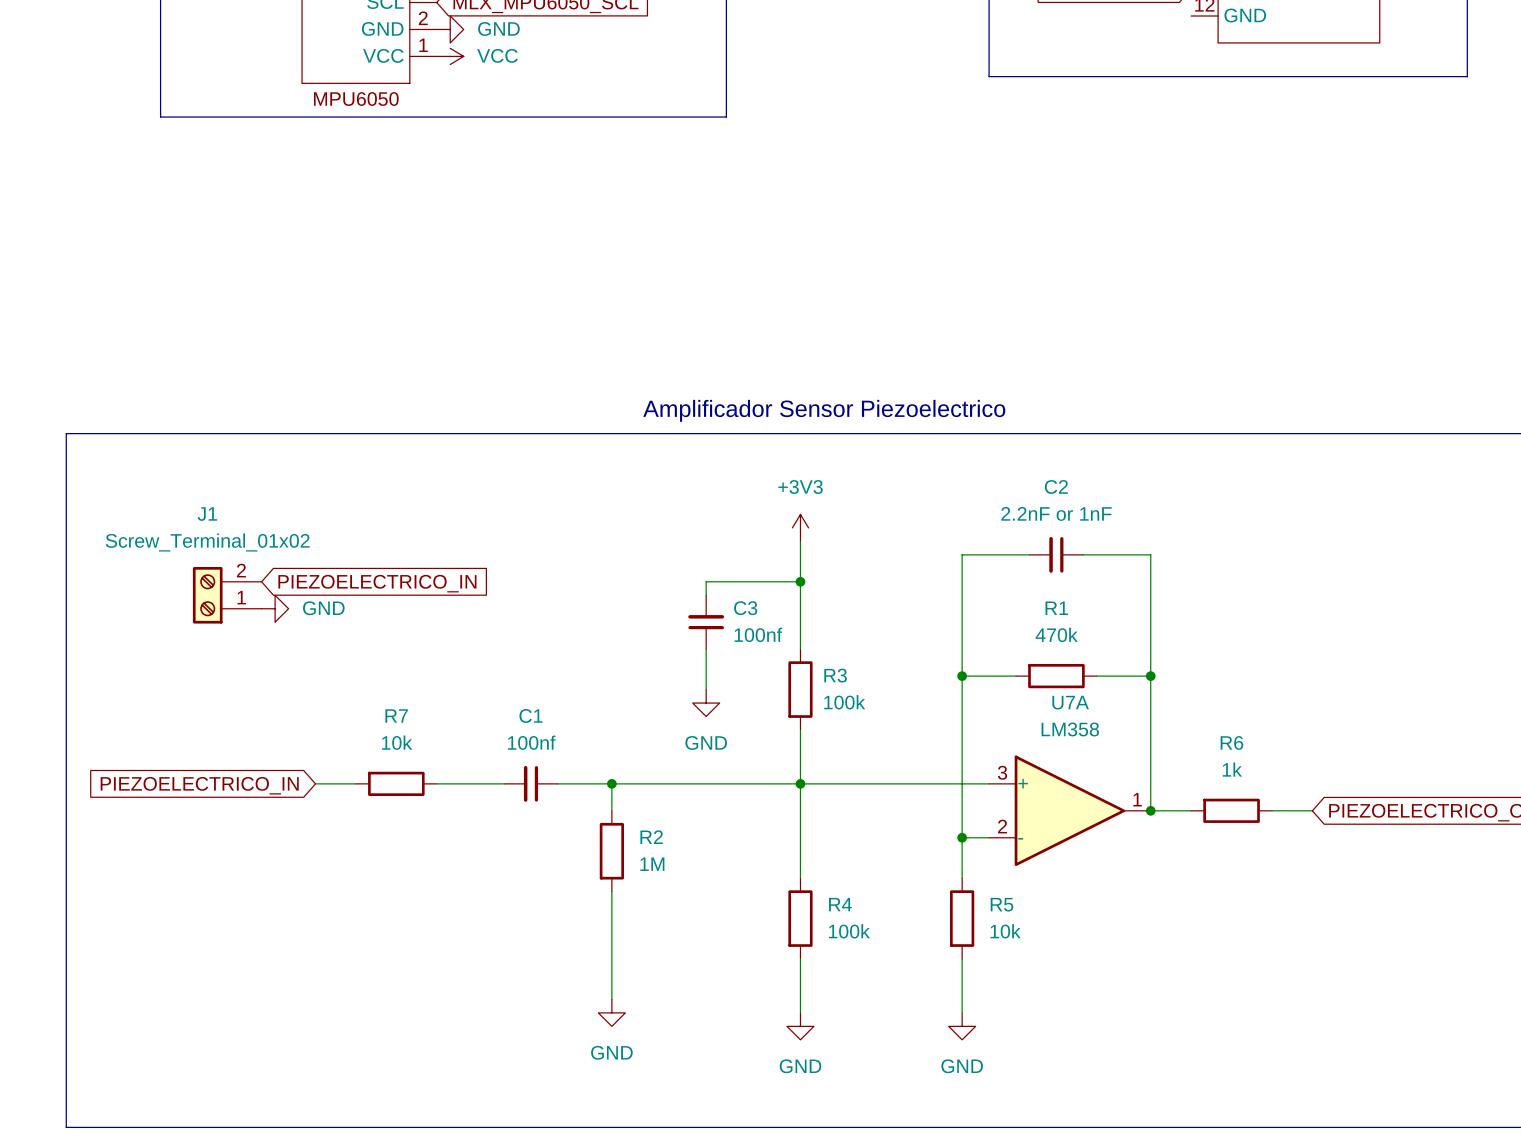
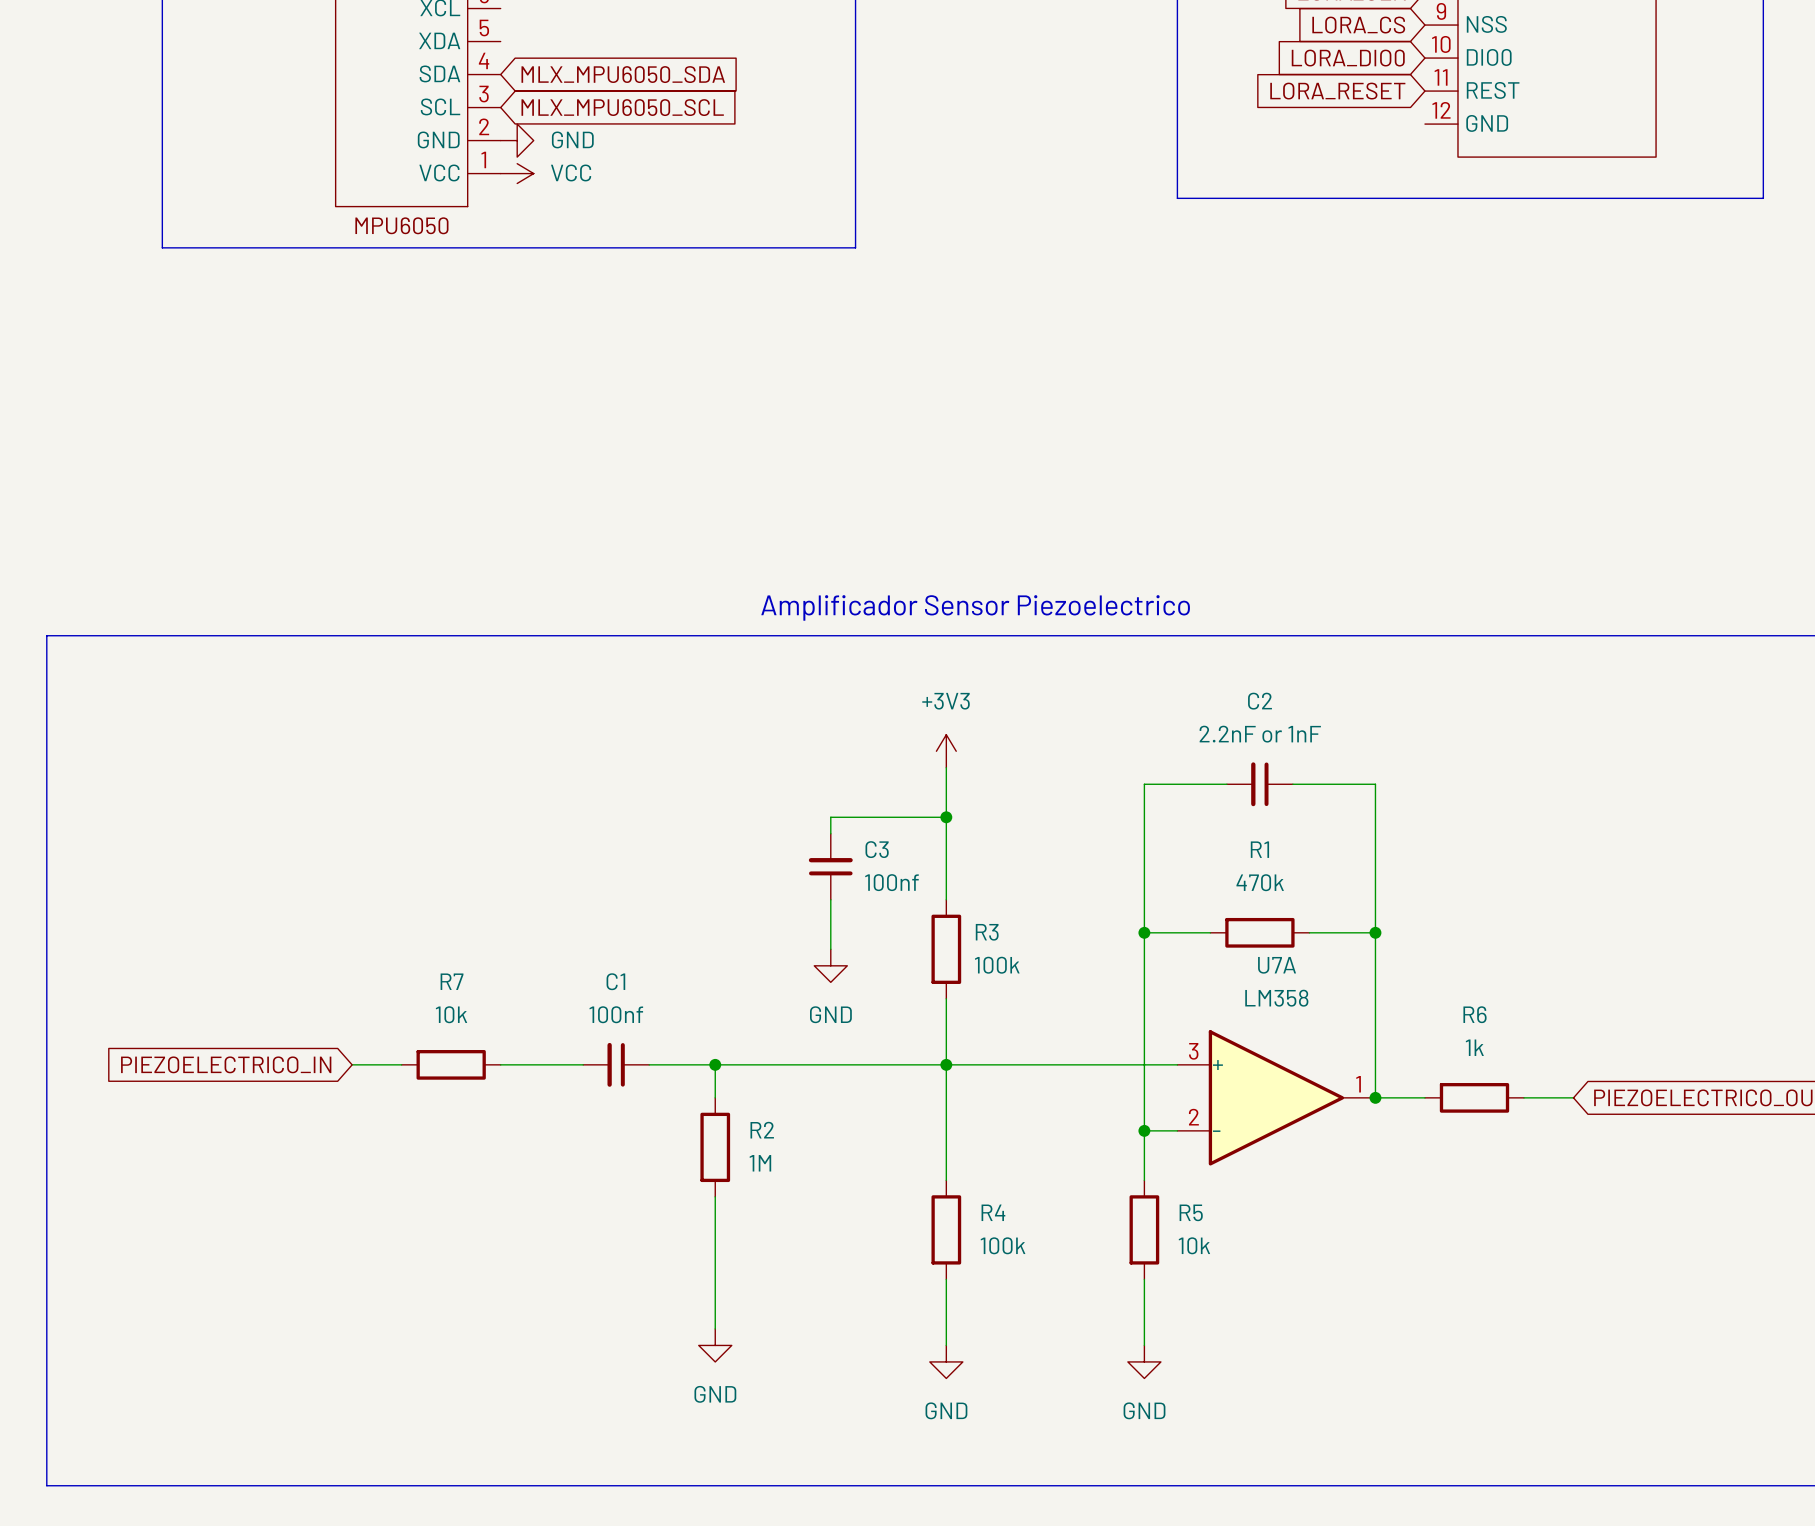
global label: PIEZOELECTRICO_IN (377, 583) -> none
J1: Screw_Terminal_01x02 (227, 595) -> none
power symbol: GND (275, 608) -> none

